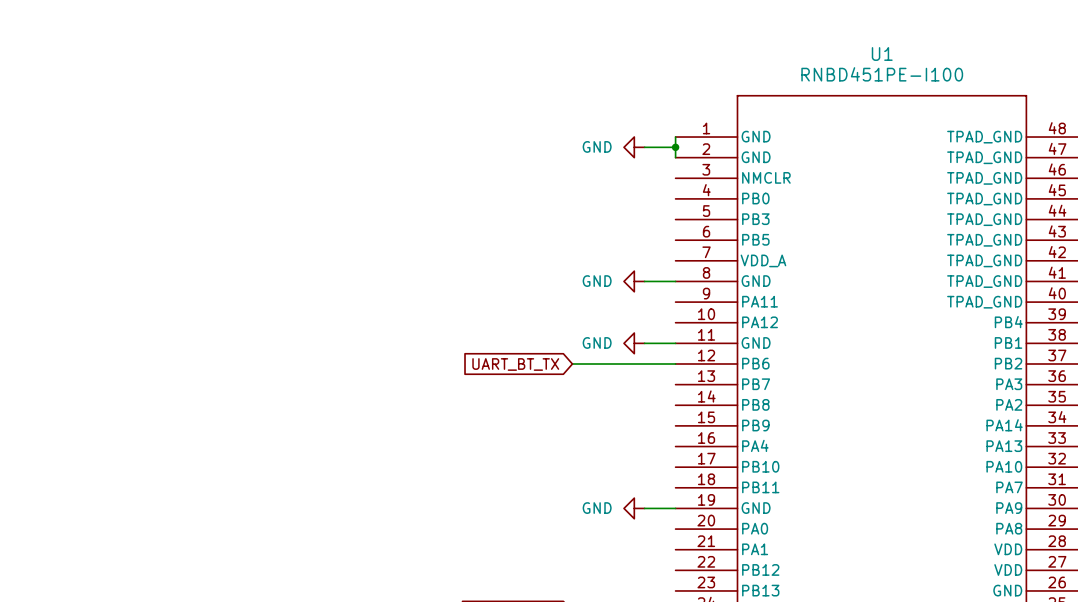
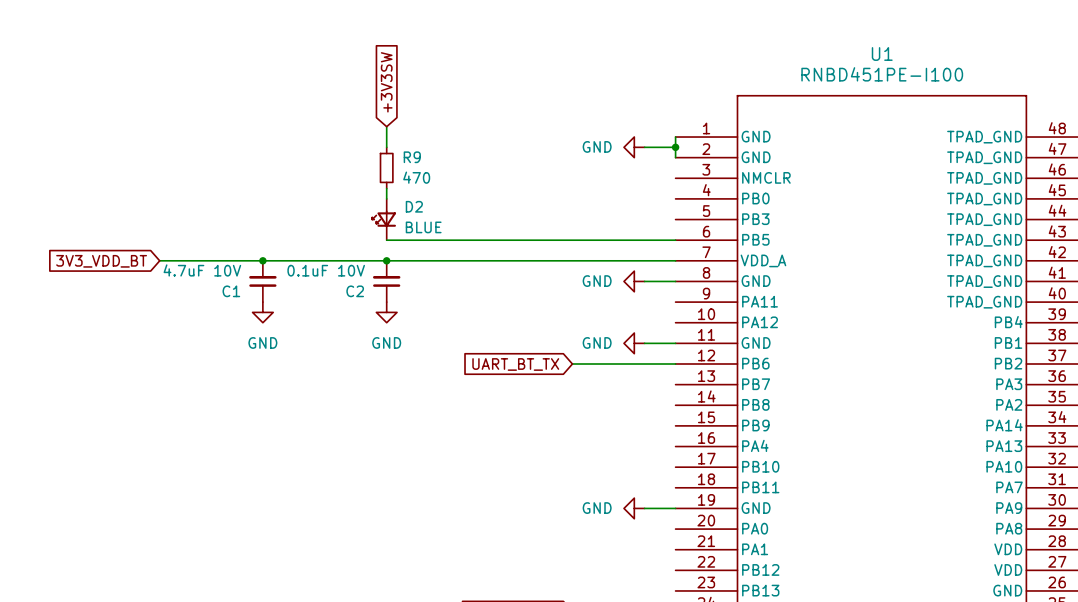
global label: none -> +3V3SW (386, 82)
wire: none -> (386, 126) (386, 147)
R9: none -> 470 (386, 167)
wire: none -> (386, 188) (386, 198)
D2: none -> BLUE (384, 219)
wire: none -> (386, 240) (675, 240)
wire: none -> (159, 260) (675, 260)
junction: none -> (262, 260)
junction: none -> (386, 260)
global label: none -> 3V3_VDD_BT (101, 261)
C1: none -> 4.7uF 10V (262, 281)
C2: none -> 0.1uF 10V (386, 281)
power symbol: none -> GND (262, 312)
power symbol: none -> GND (386, 312)

